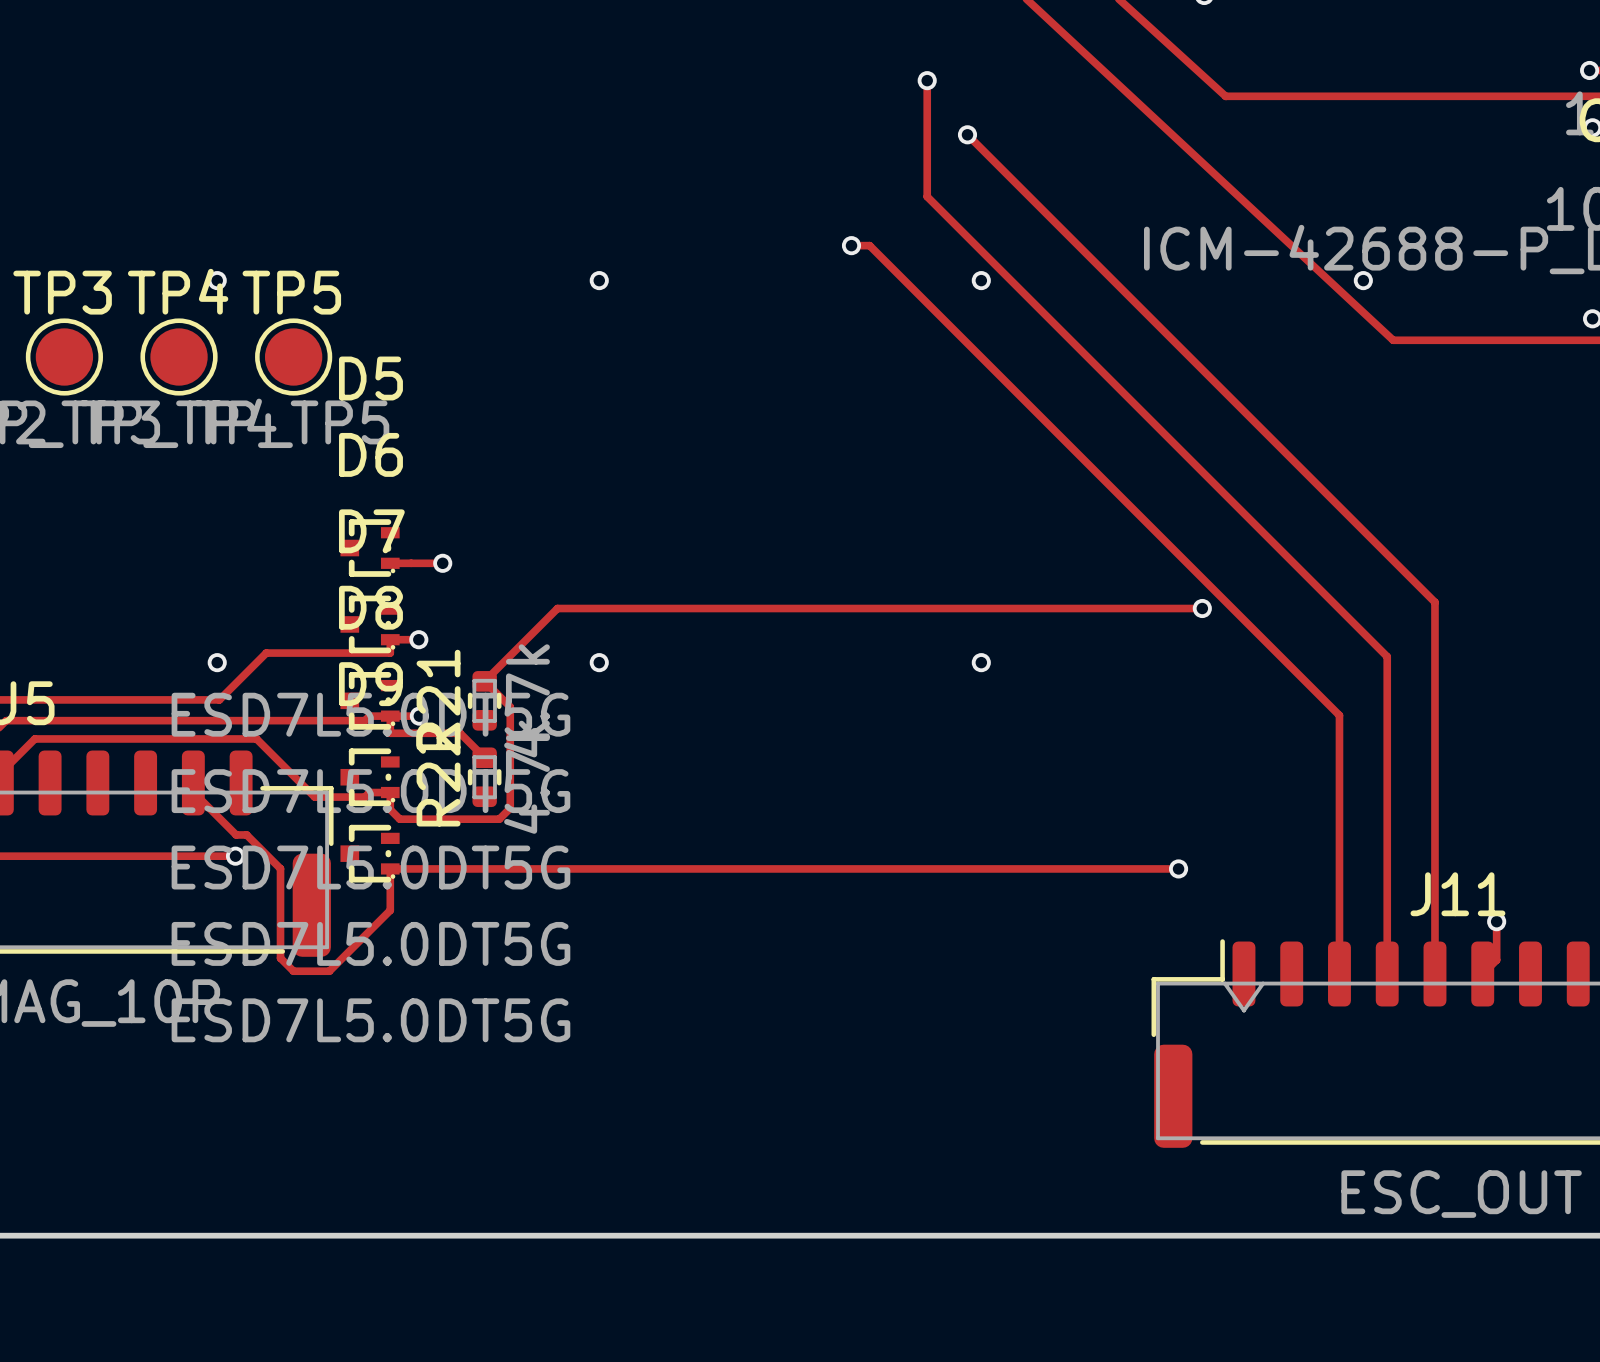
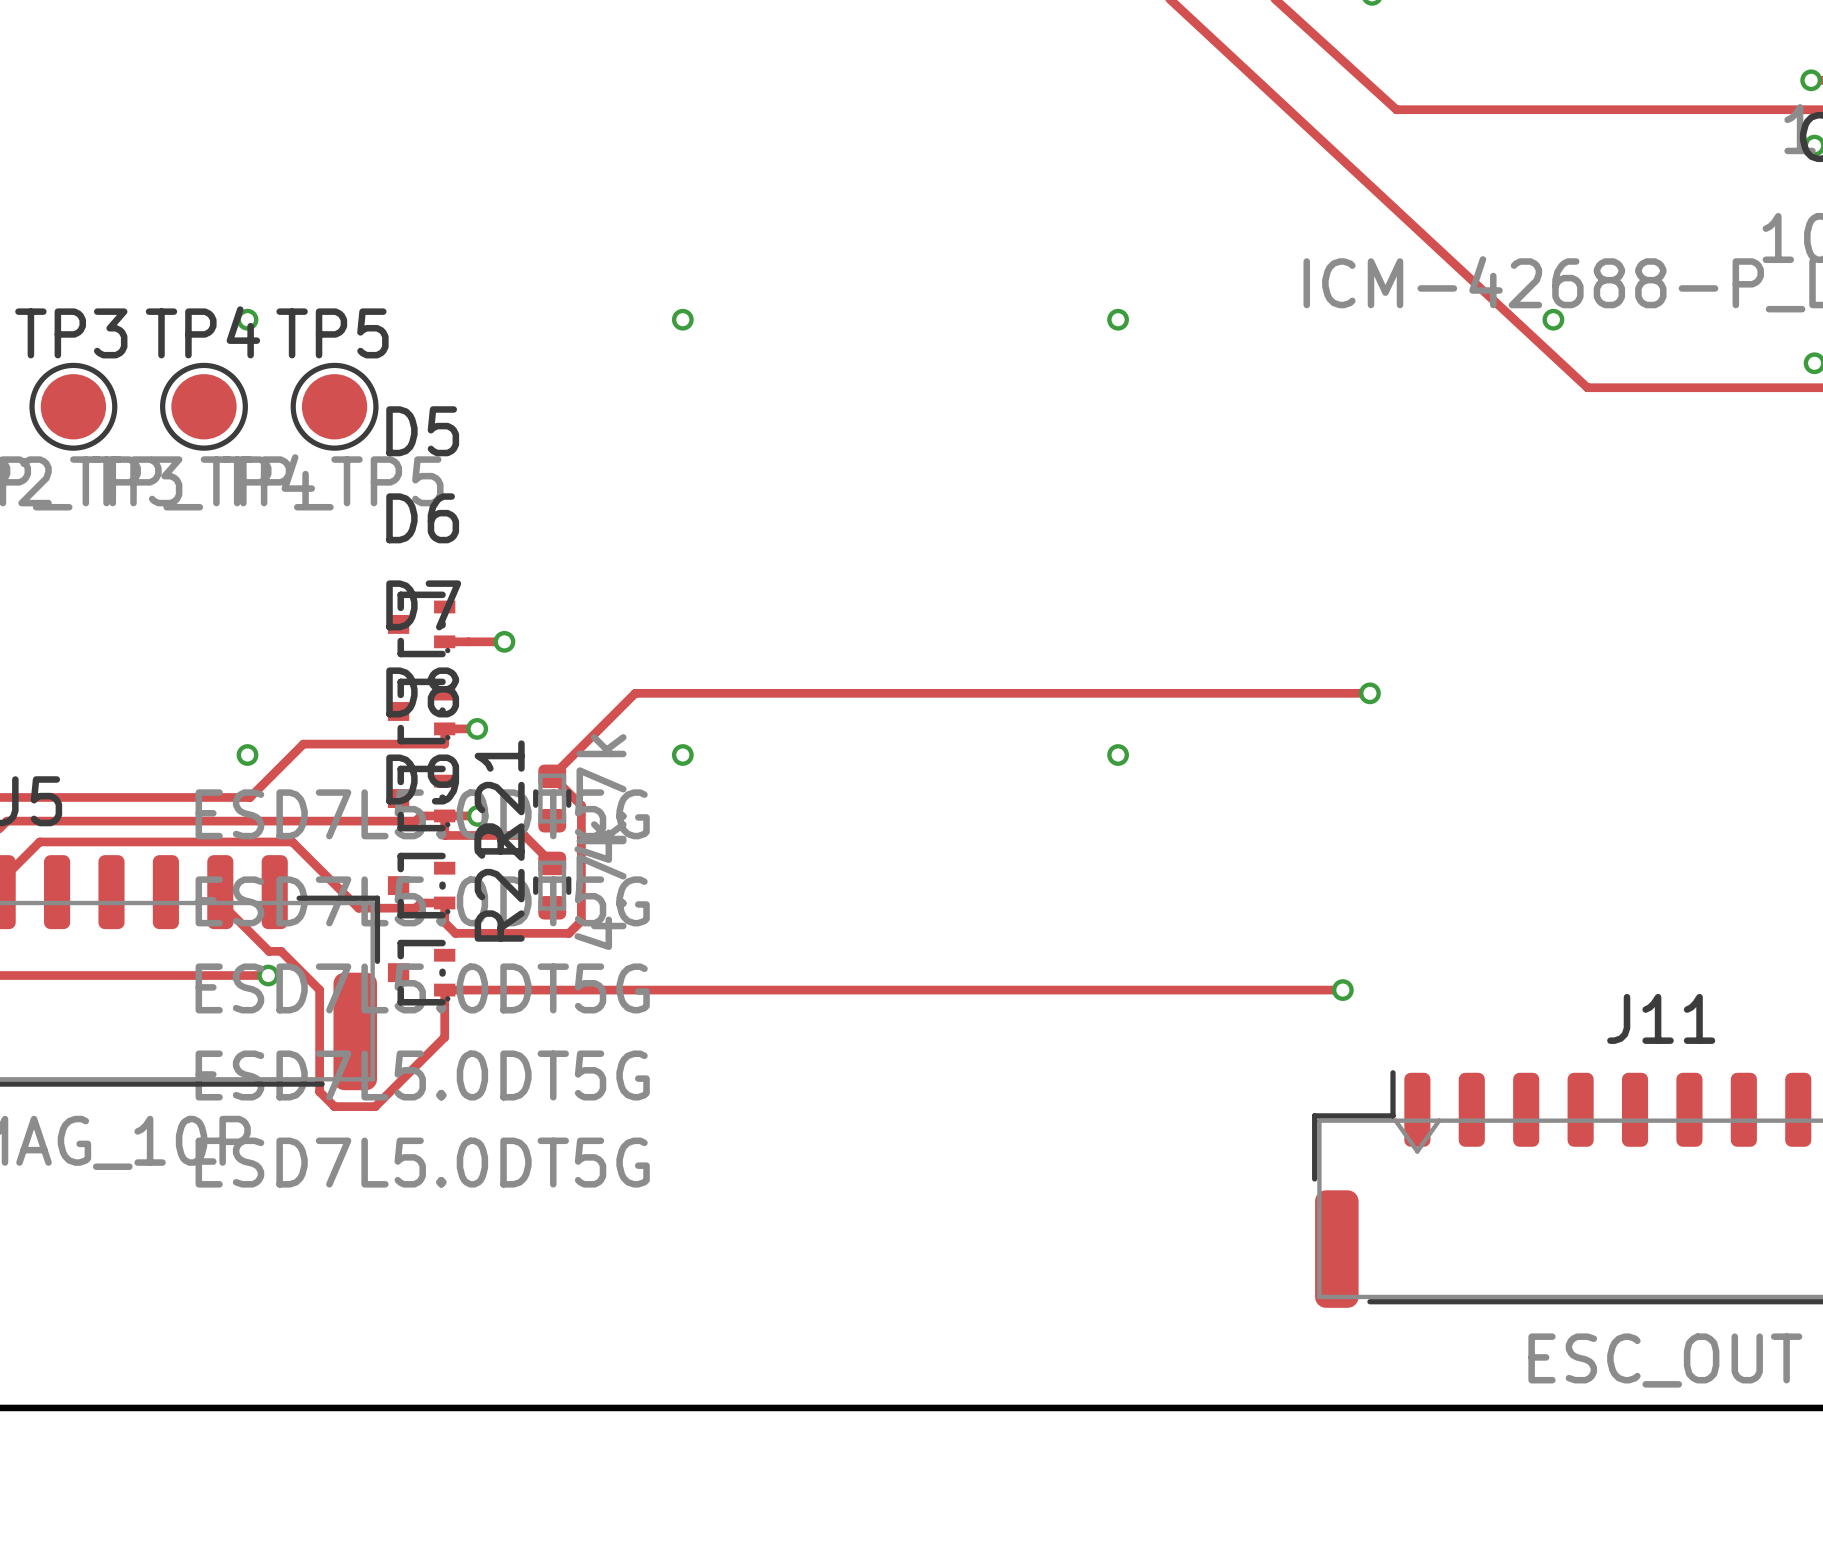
track: (927, 80) (927, 196) (1387, 656) (1387, 974) -> none
via: (927, 80) -> none
track: (967, 134) (1434, 602) (1434, 974) -> none
via: (967, 134) -> none
track: (851, 245) (869, 245) (1339, 715) (1339, 974) -> none
via: (851, 245) -> none
track: (1496, 921) (1496, 960) (1482, 974) -> none
via: (1496, 921) -> none

